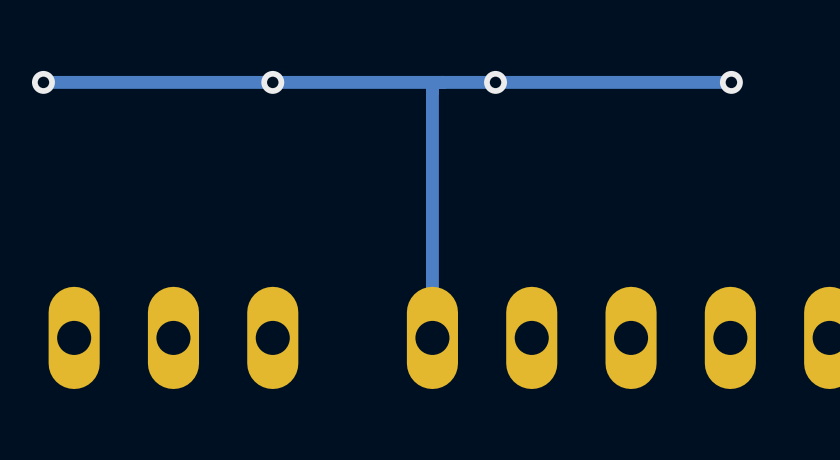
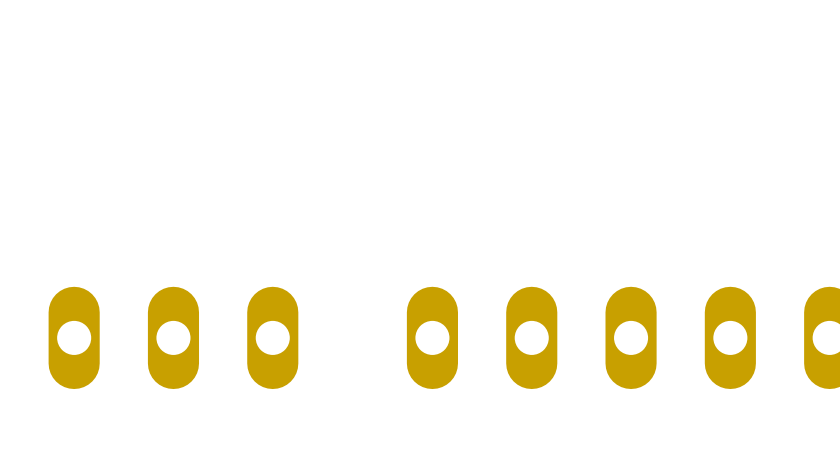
via: (43, 82) -> none
via: (272, 82) -> none
track: (430, 82) (432, 84) (432, 337) -> none
via: (495, 82) -> none
track: (731, 82) (43, 82) -> none
via: (731, 82) -> none

